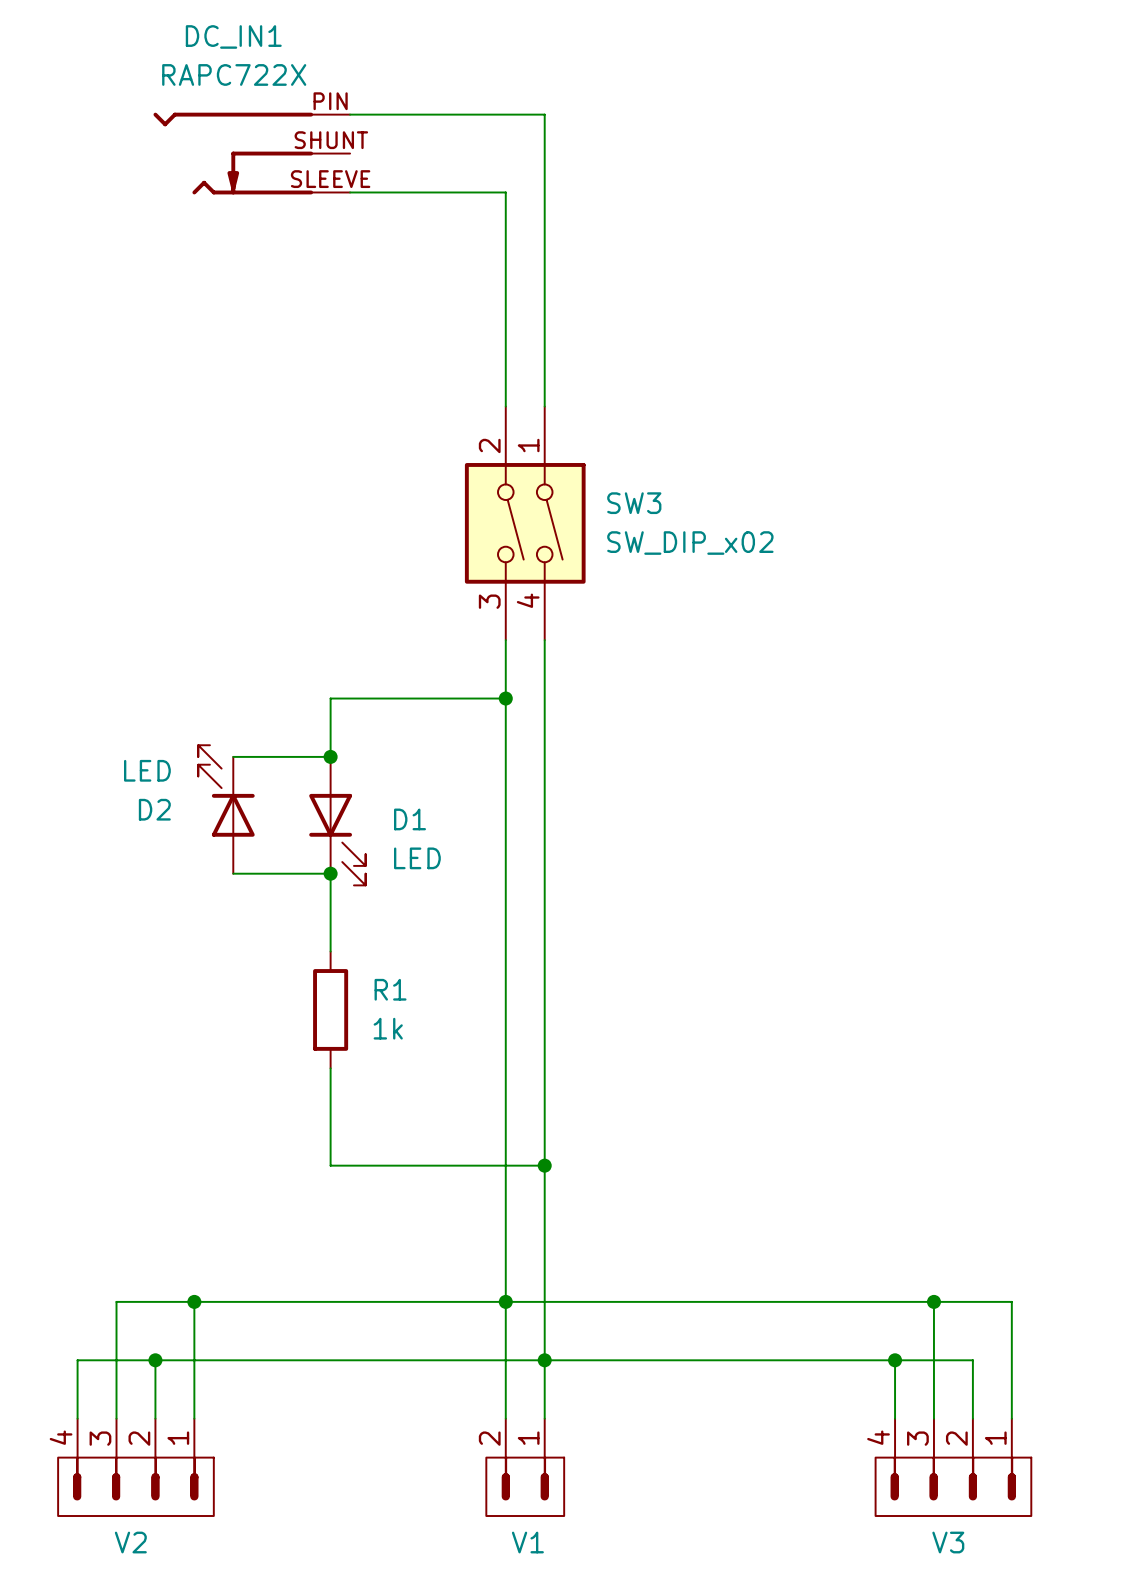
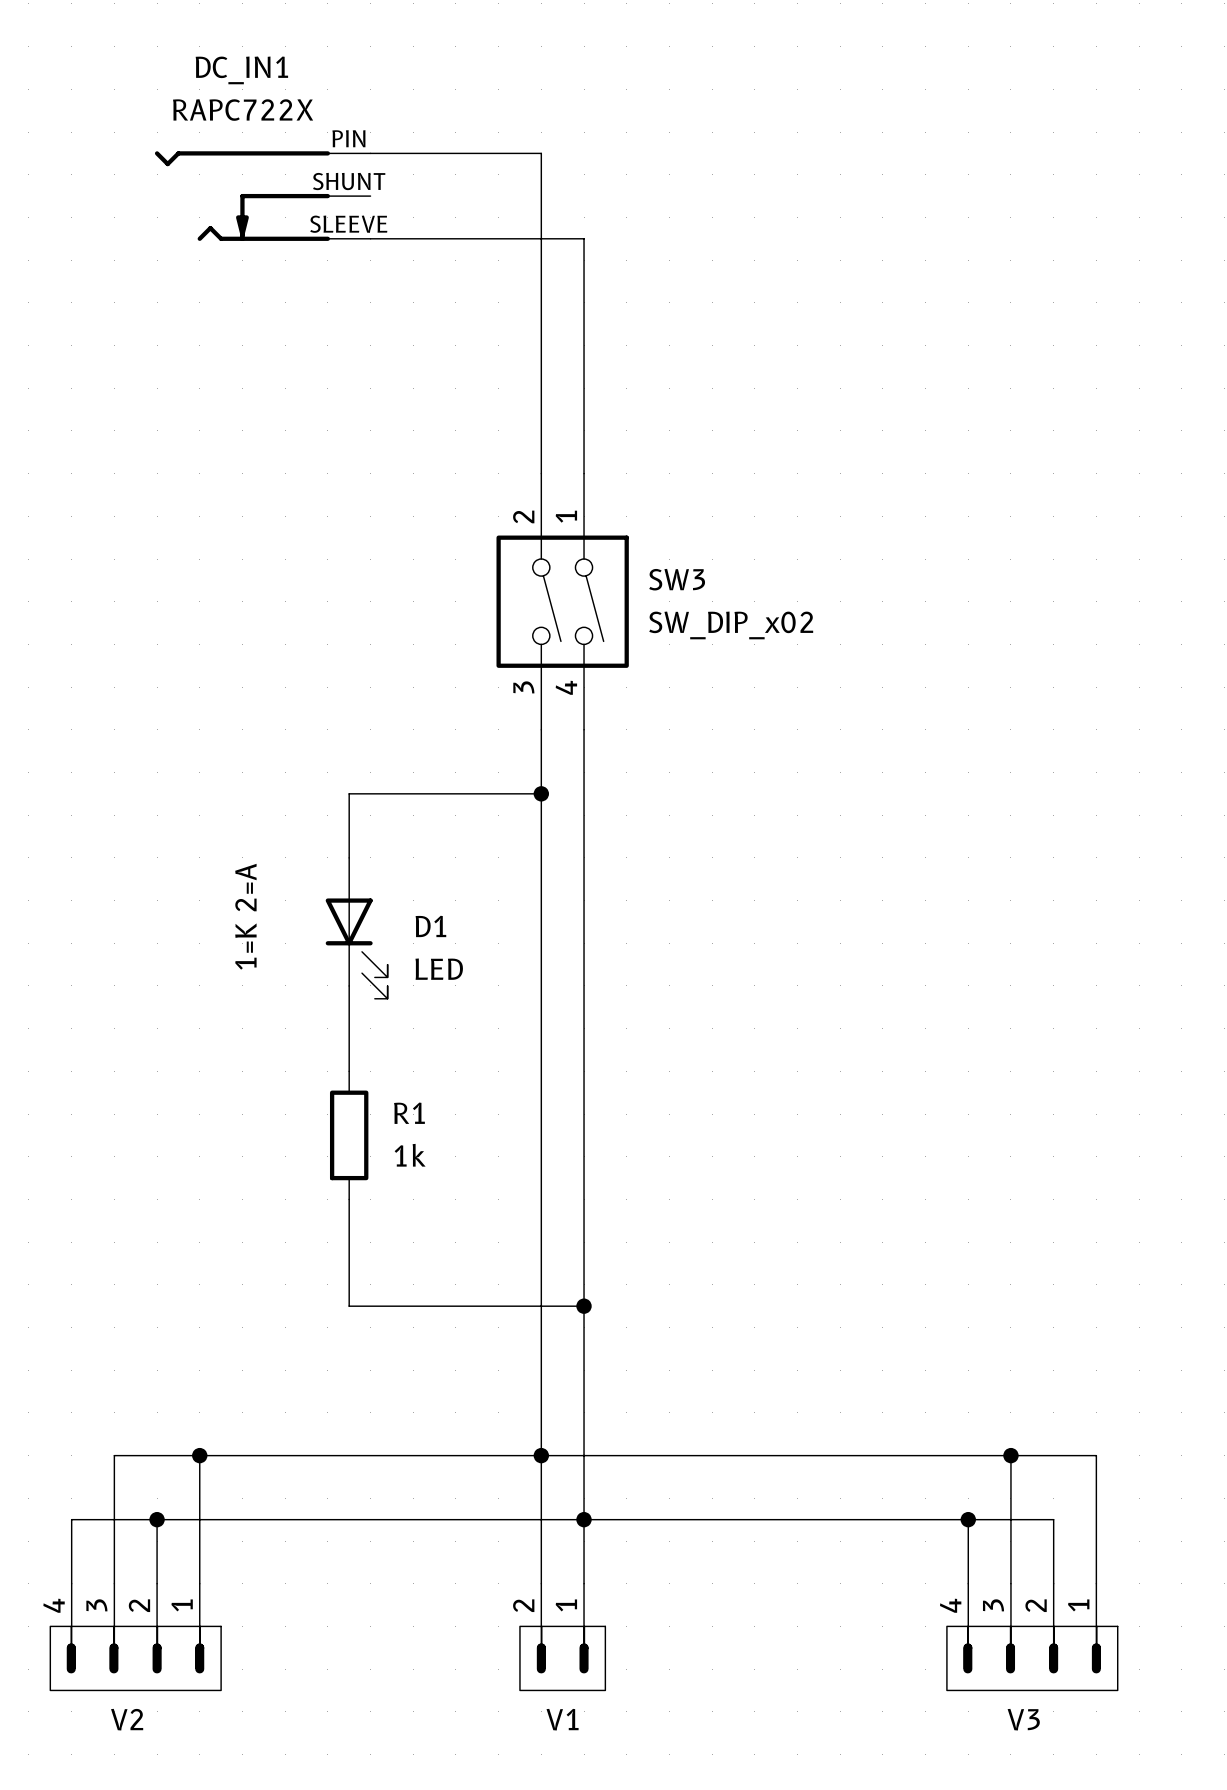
wire: (505, 114) (544, 114) (544, 192) -> (541, 153) (541, 238) (584, 238)
wire: (233, 756) (330, 756) -> none
junction: (330, 756) -> none
D2: LED (226, 809) -> none
D1 text: none -> 1=K 2=A (245, 916)
wire: (233, 873) (330, 873) -> none
junction: (330, 873) -> none

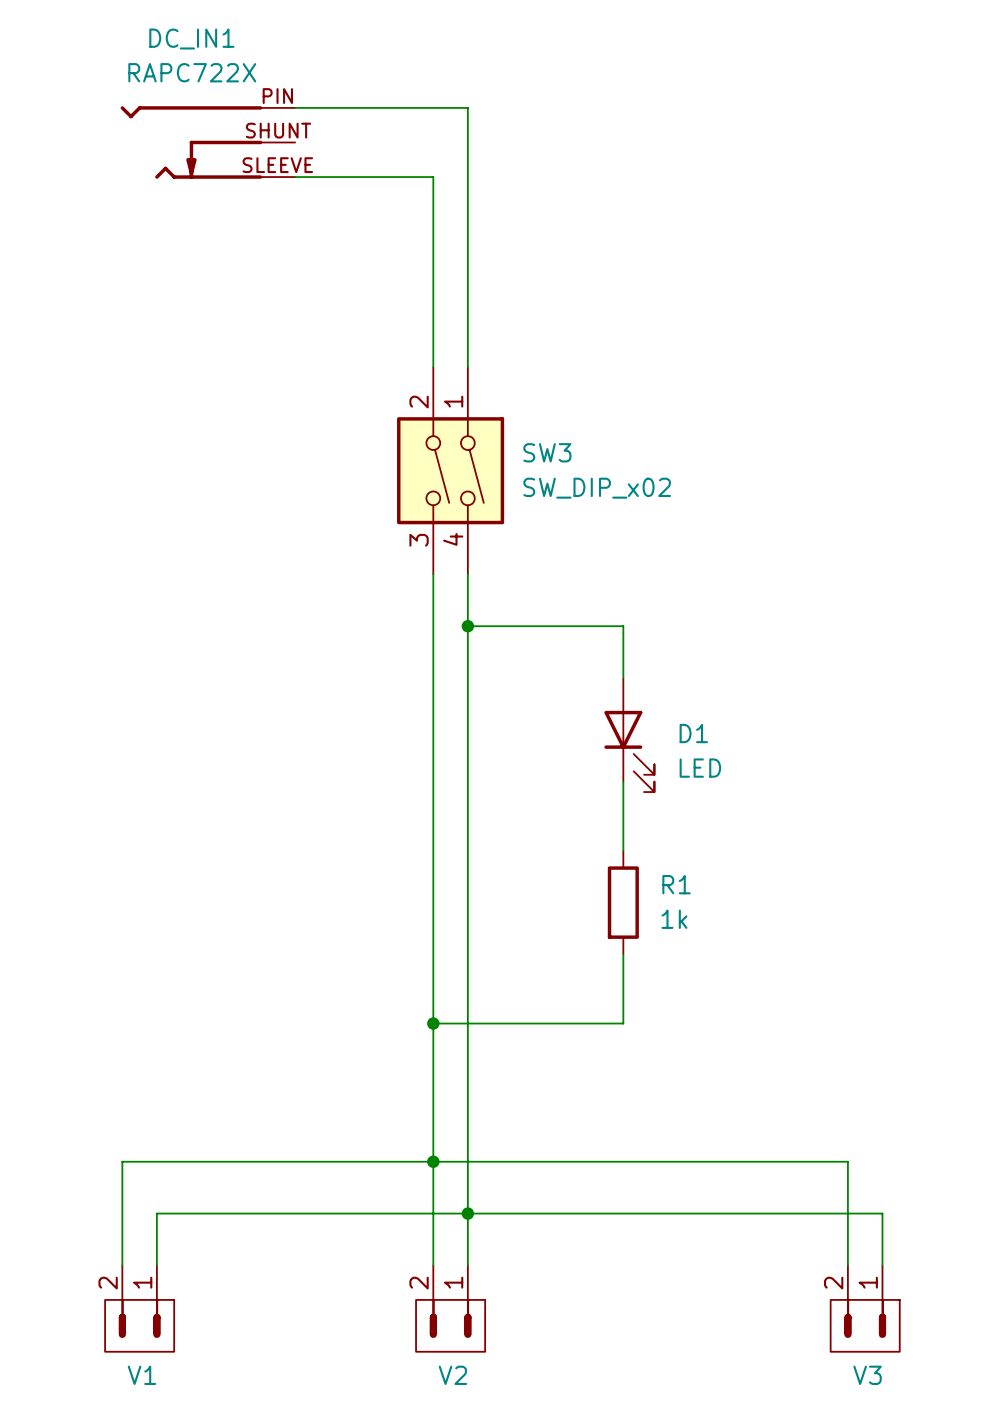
wire: (541, 153) (541, 238) (584, 238) -> (433, 107) (467, 107) (467, 177)
wire: (541, 793) (349, 793) (349, 857) -> none
junction position: (541, 793) -> (467, 626)
wire: none -> (467, 626) (623, 626) (623, 678)
D1 text: 1=K 2=A (245, 916) -> none
D1 position: (356, 928) -> (629, 735)
wire: (349, 985) (349, 1071) -> none
wire: none -> (623, 781) (623, 850)
R1 position: (349, 1135) -> (623, 902)
wire: (349, 1199) (349, 1306) (584, 1306) -> none
wire: none -> (623, 954) (623, 1023) (433, 1023)
junction position: (584, 1306) -> (433, 1023)
wire: (157, 1455) (114, 1455) (114, 1583) -> (122, 1161) (122, 1213)
wire: (199, 1455) (199, 1519) (71, 1519) (71, 1583) -> none
junction: (199, 1455) -> none
wire: (1010, 1455) (1010, 1583) -> none
junction: (1010, 1455) -> none
wire: (1053, 1455) (1096, 1455) (1096, 1519) -> (847, 1161) (847, 1213) (882, 1213)
junction: (157, 1519) -> none
V3 symbol: [946, 1519, 1182, 1691] -> [830, 1213, 952, 1352]
wire: (968, 1519) (968, 1583) -> none
junction: (968, 1519) -> none
V2: (167, 1605) -> none
V1: none -> (165, 1282)
V1 name: V1 (562, 1719) -> V2 (452, 1375)

